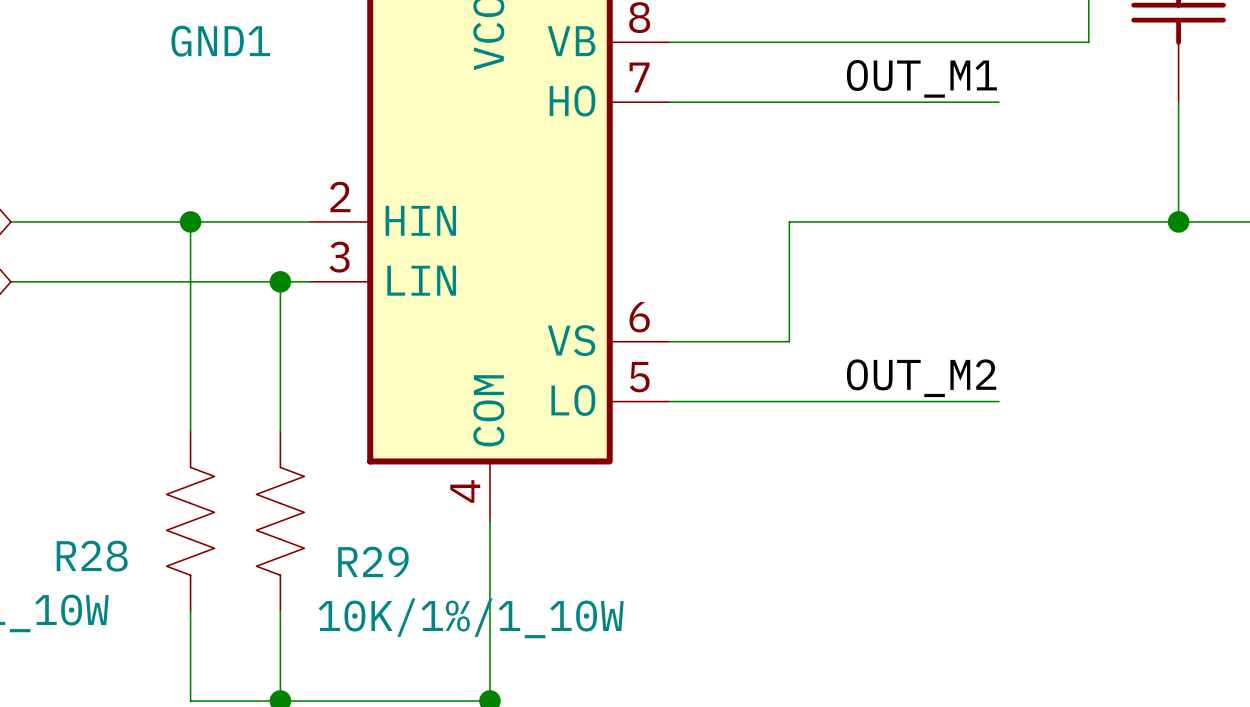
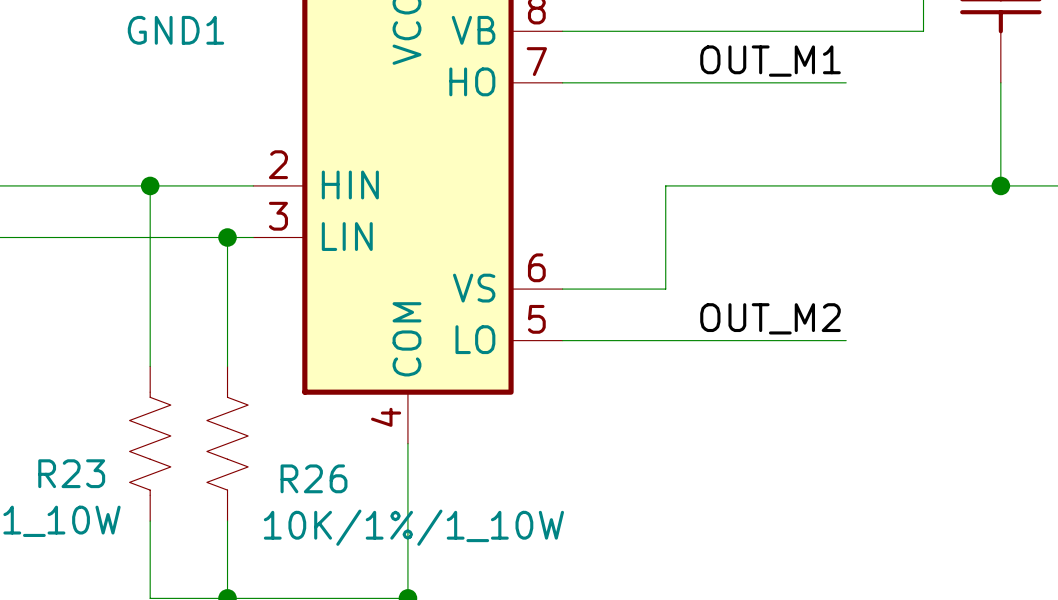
R28 name: R28 (92, 556) -> R23 (71, 473)
R29 name: R29 (373, 561) -> R26 (314, 478)

